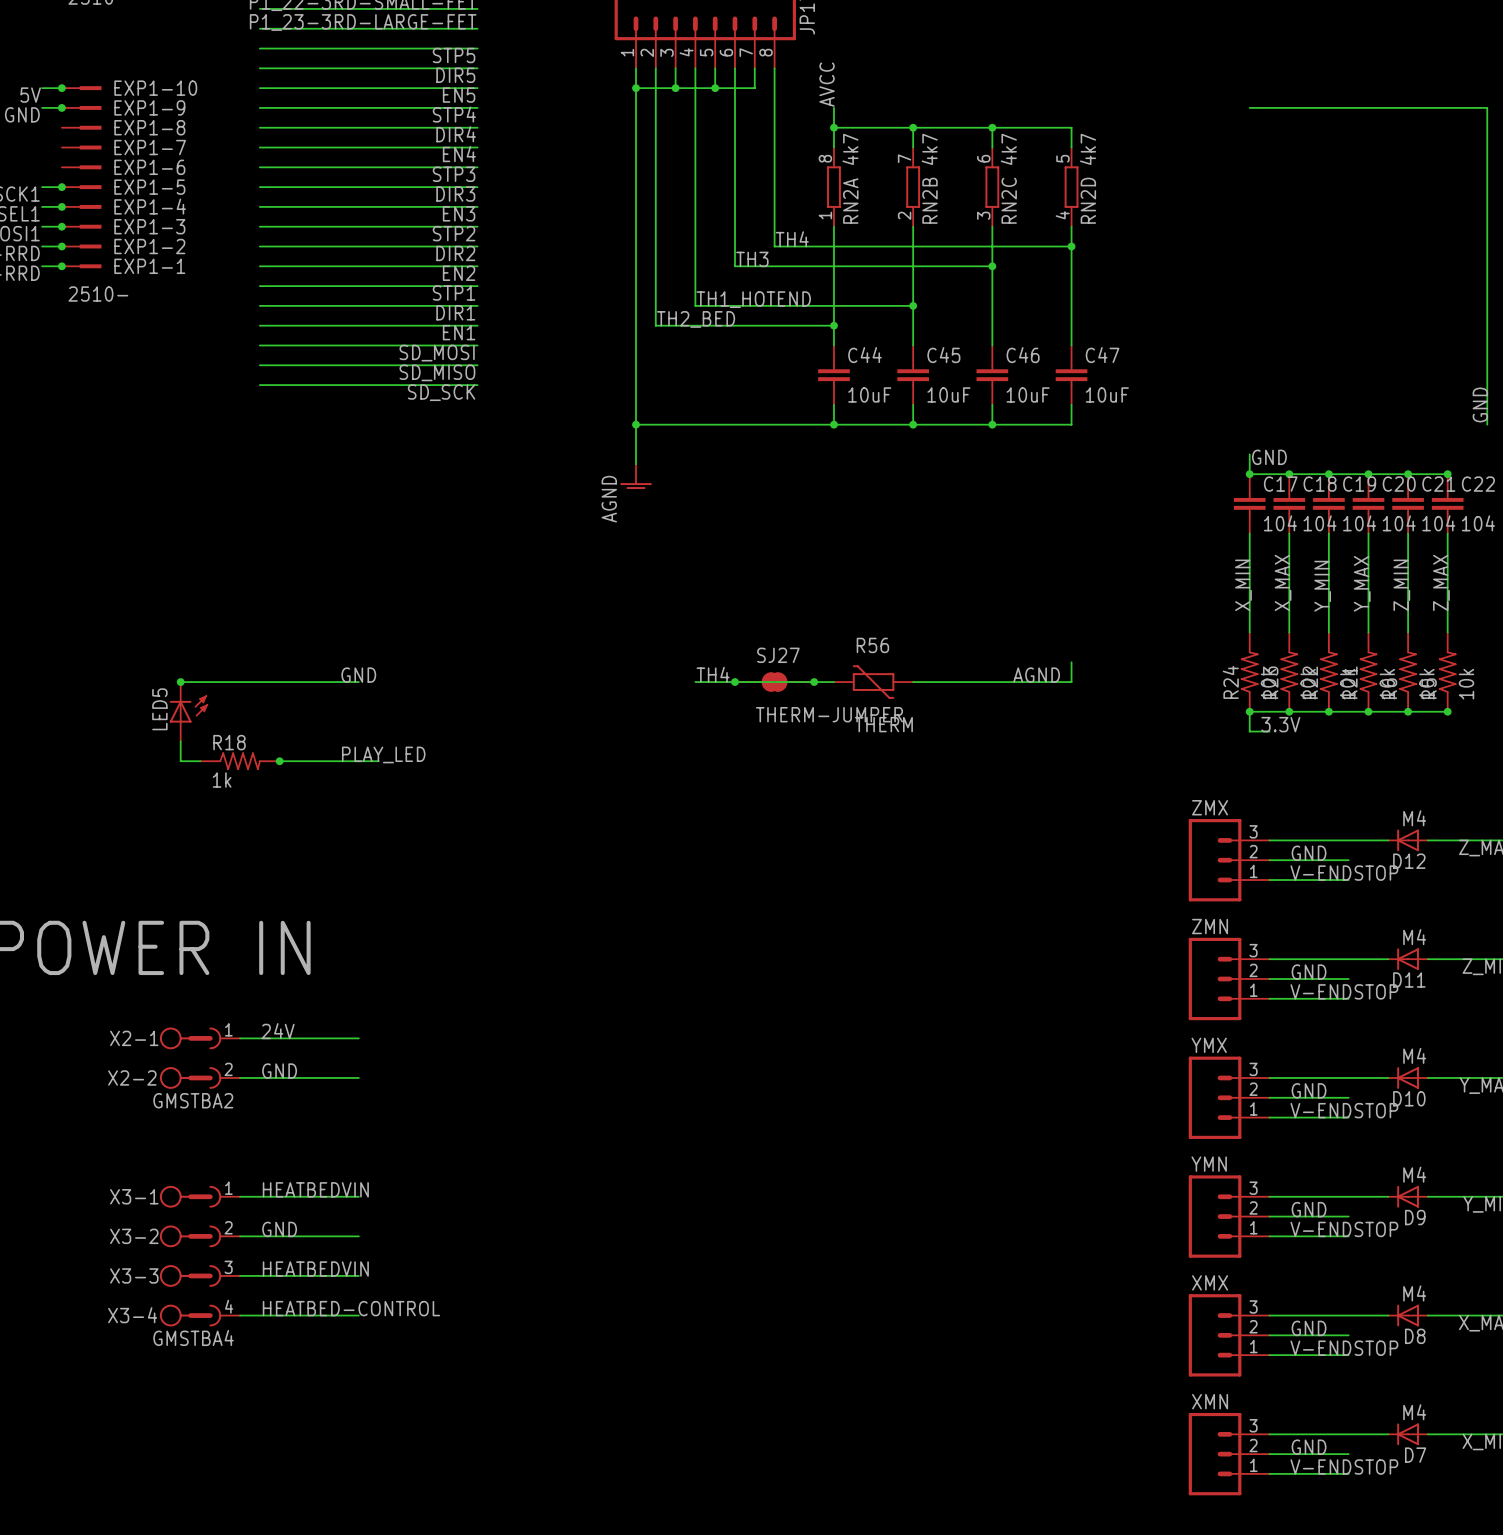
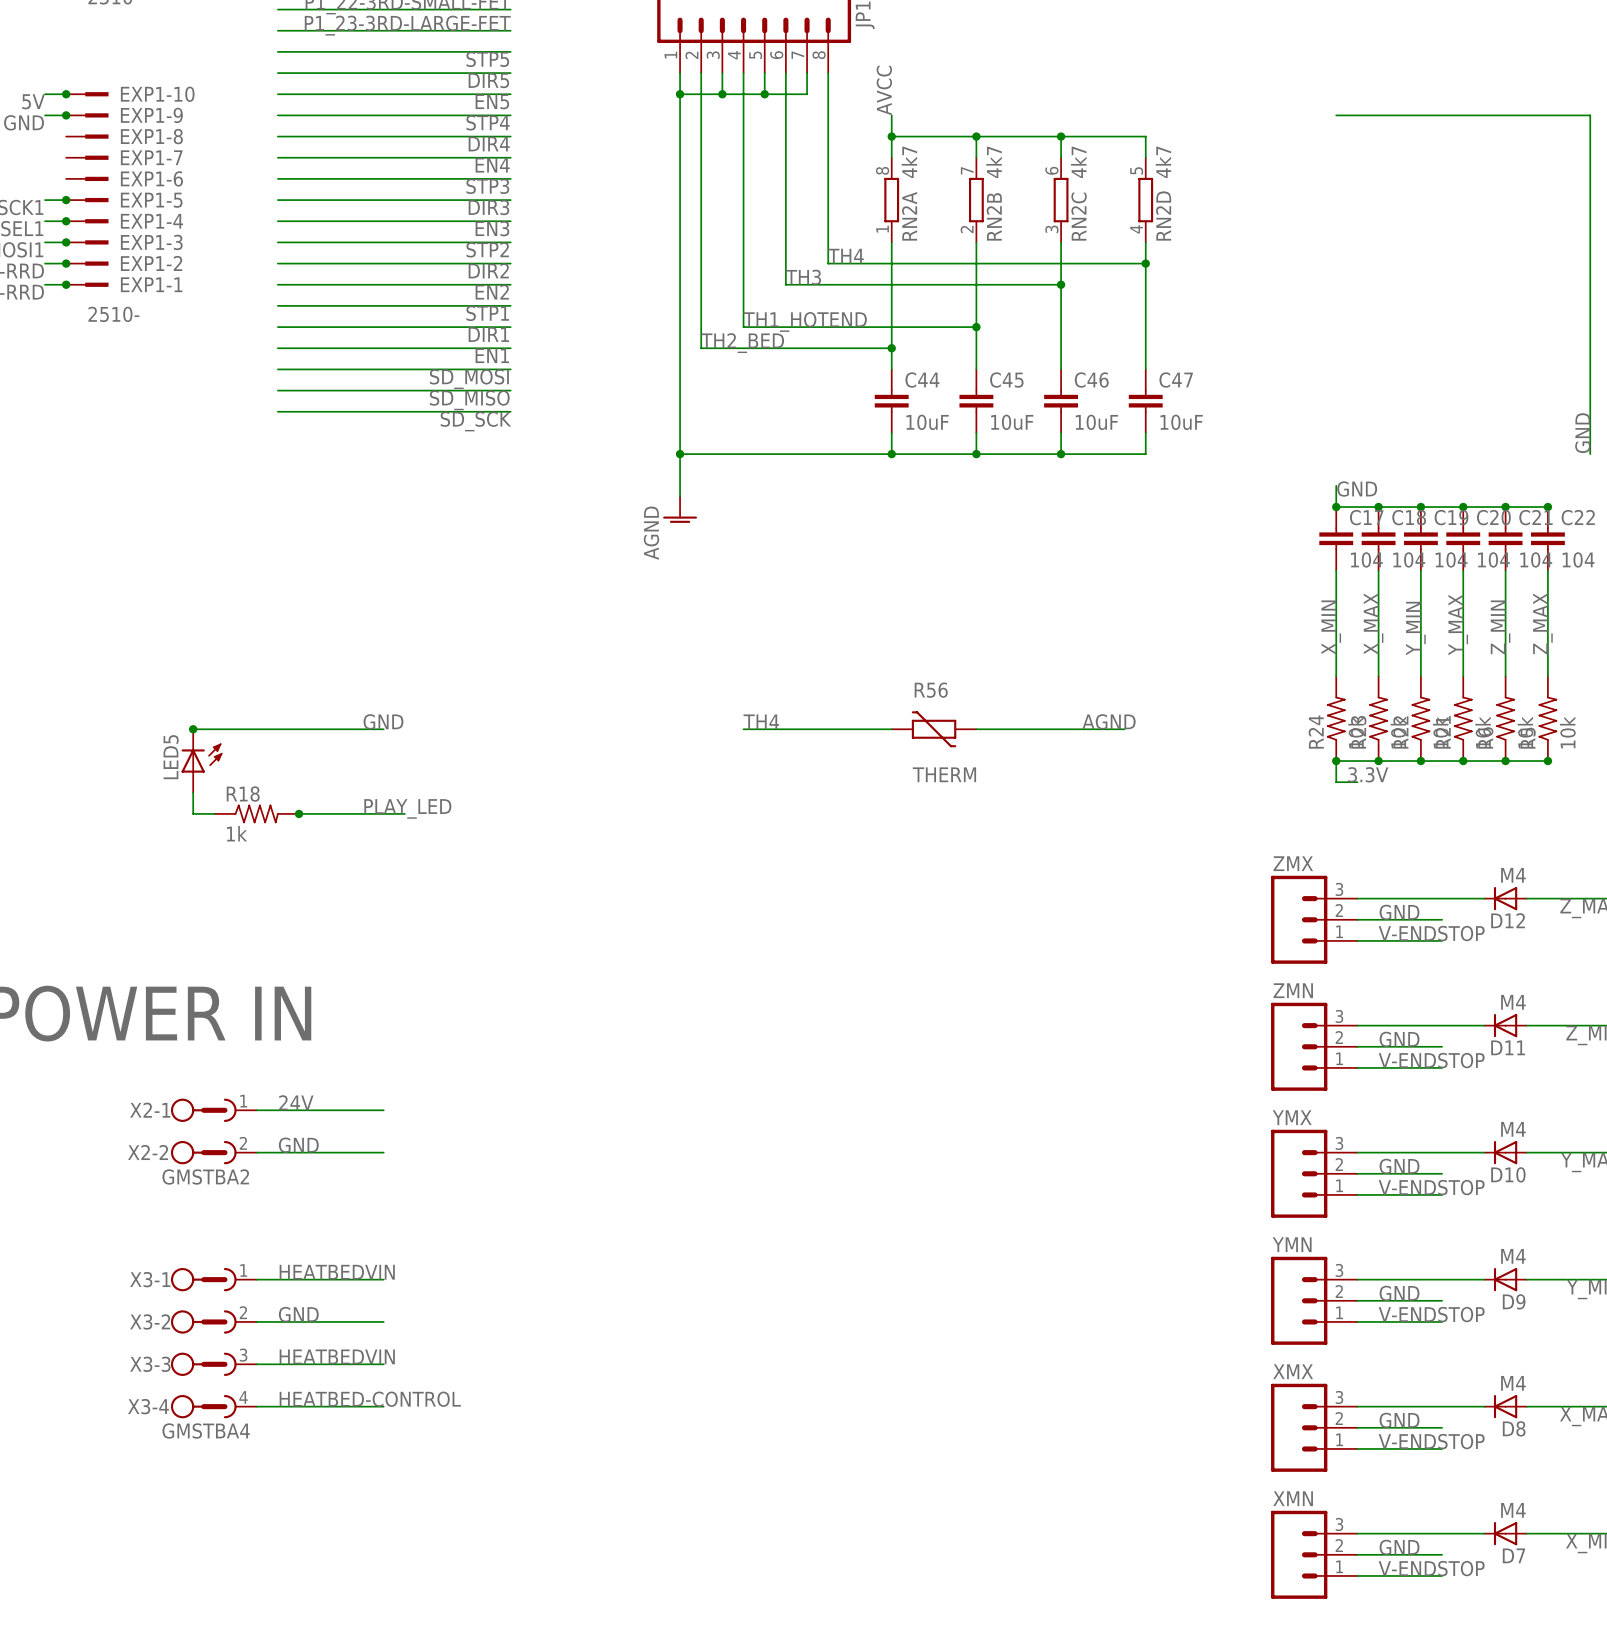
wire: (1071, 662) (1071, 682) (1051, 682) -> none
junction: (734, 682) -> none
SJ27: THERM-JUMPER (774, 682) -> none
junction: (814, 682) -> none

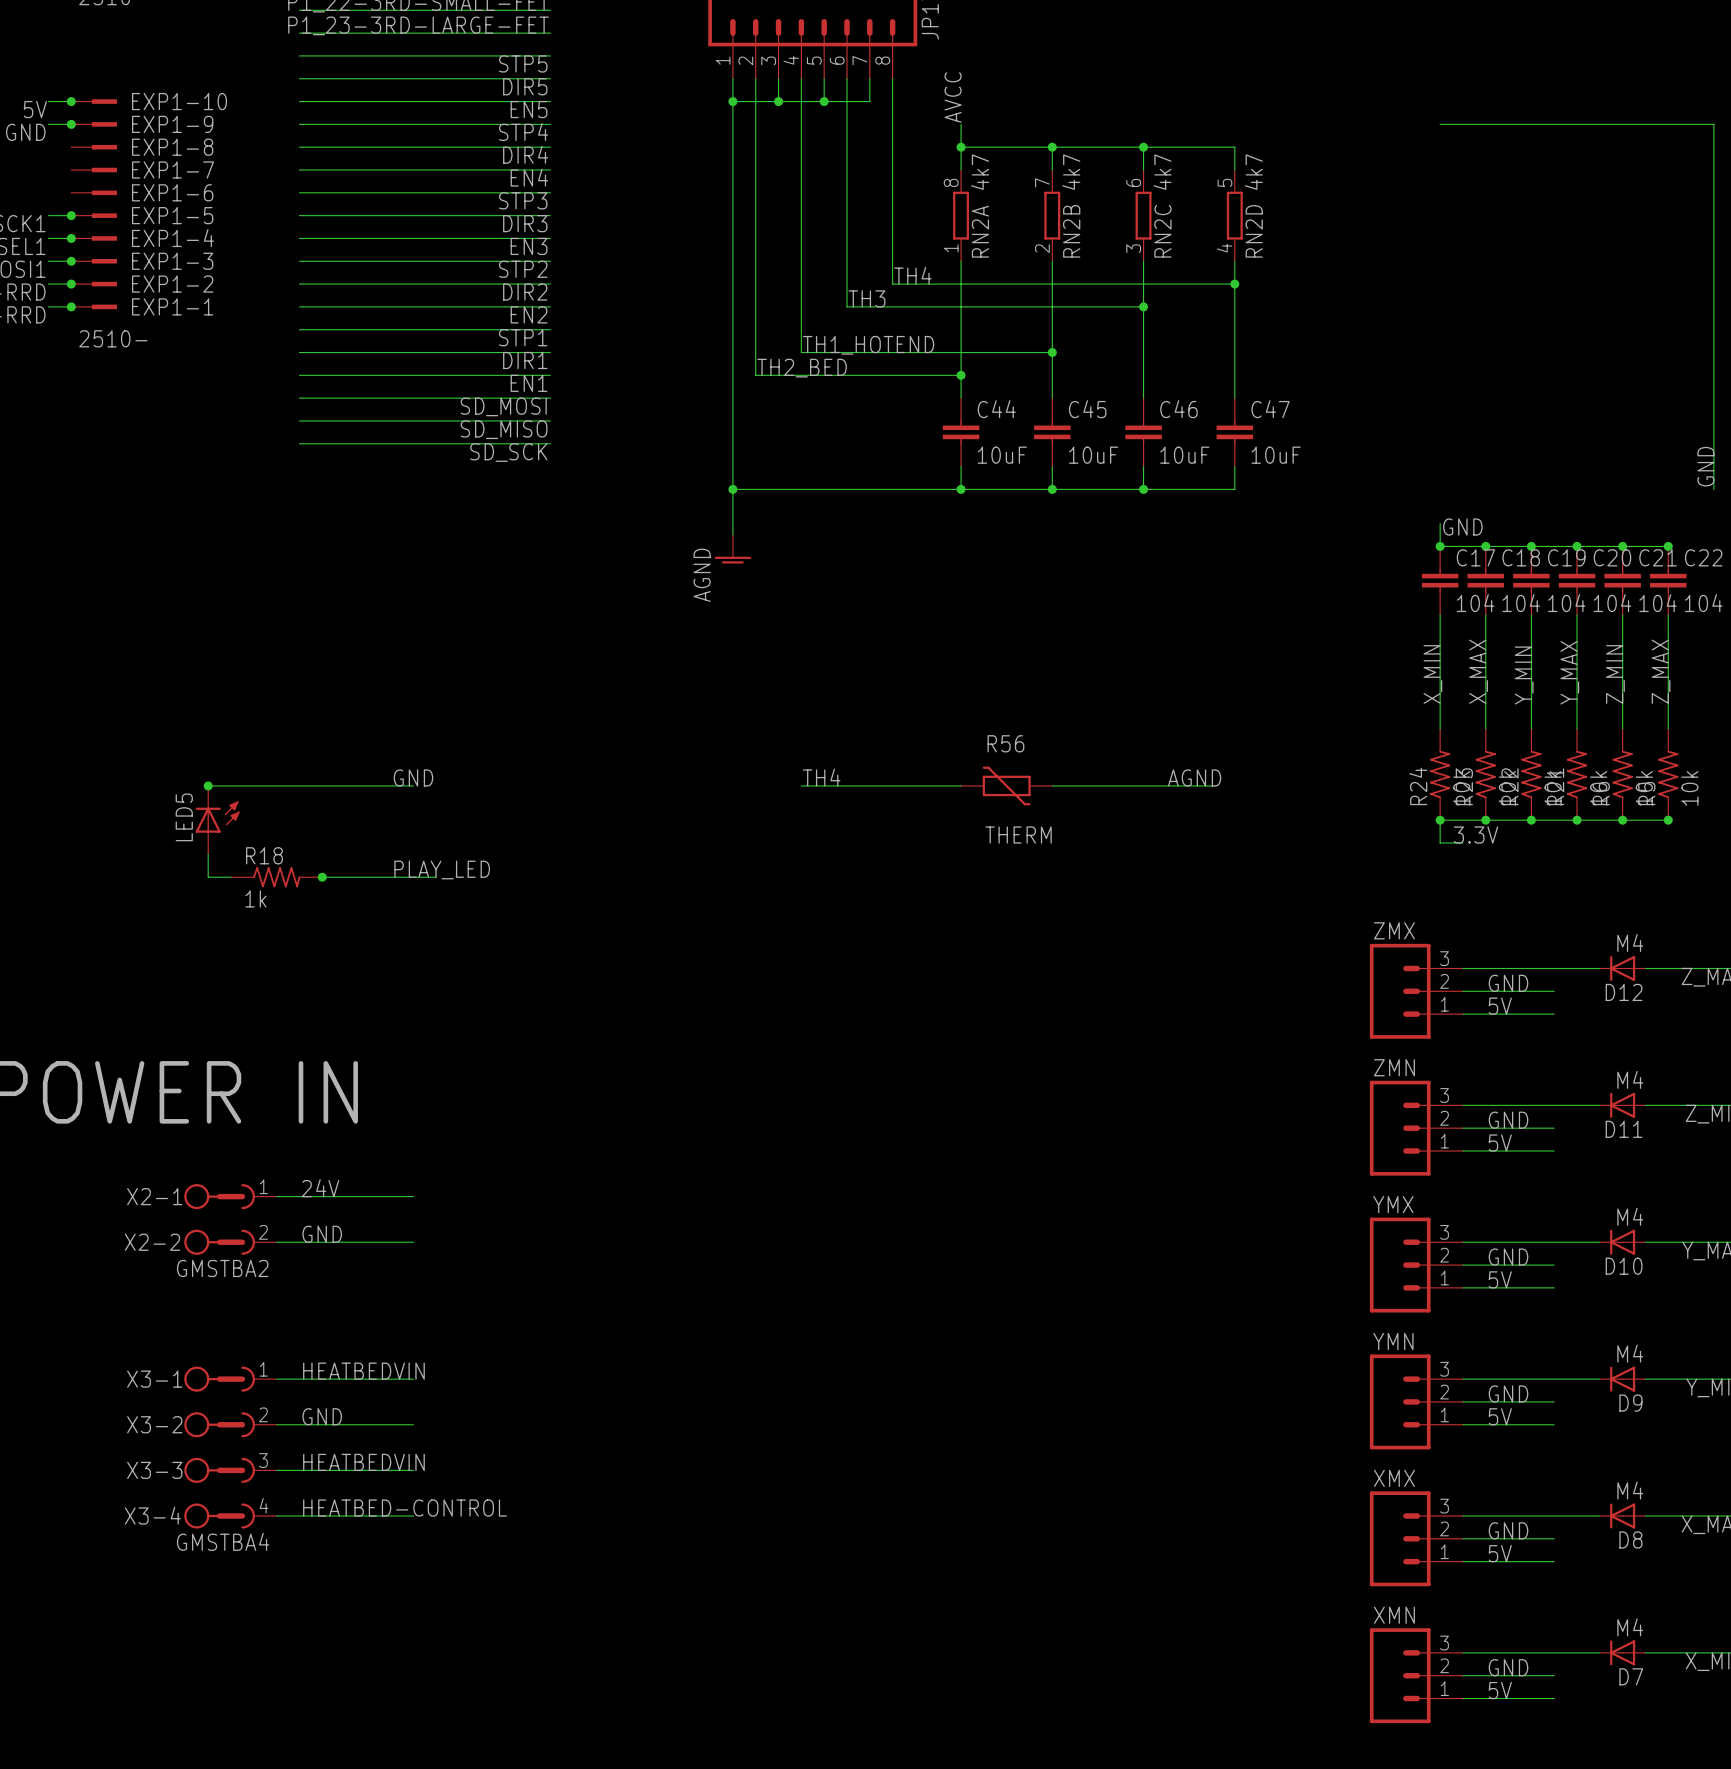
label: V-ENDSTOP (1431, 933) -> 5V (1500, 1006)
label: V-ENDSTOP (1431, 1060) -> 5V (1500, 1143)
label: V-ENDSTOP (1431, 1187) -> 5V (1500, 1279)
label: V-ENDSTOP (1431, 1314) -> 5V (1500, 1416)
label: V-ENDSTOP (1431, 1441) -> 5V (1500, 1553)
label: V-ENDSTOP (1431, 1568) -> 5V (1500, 1690)

